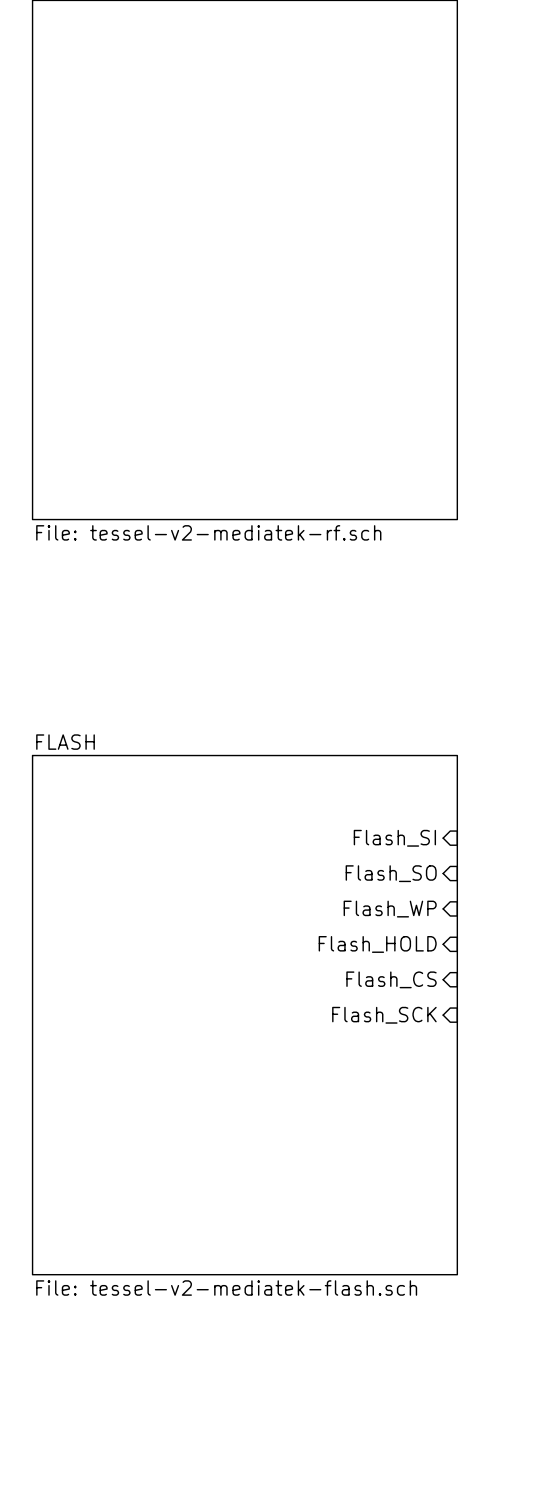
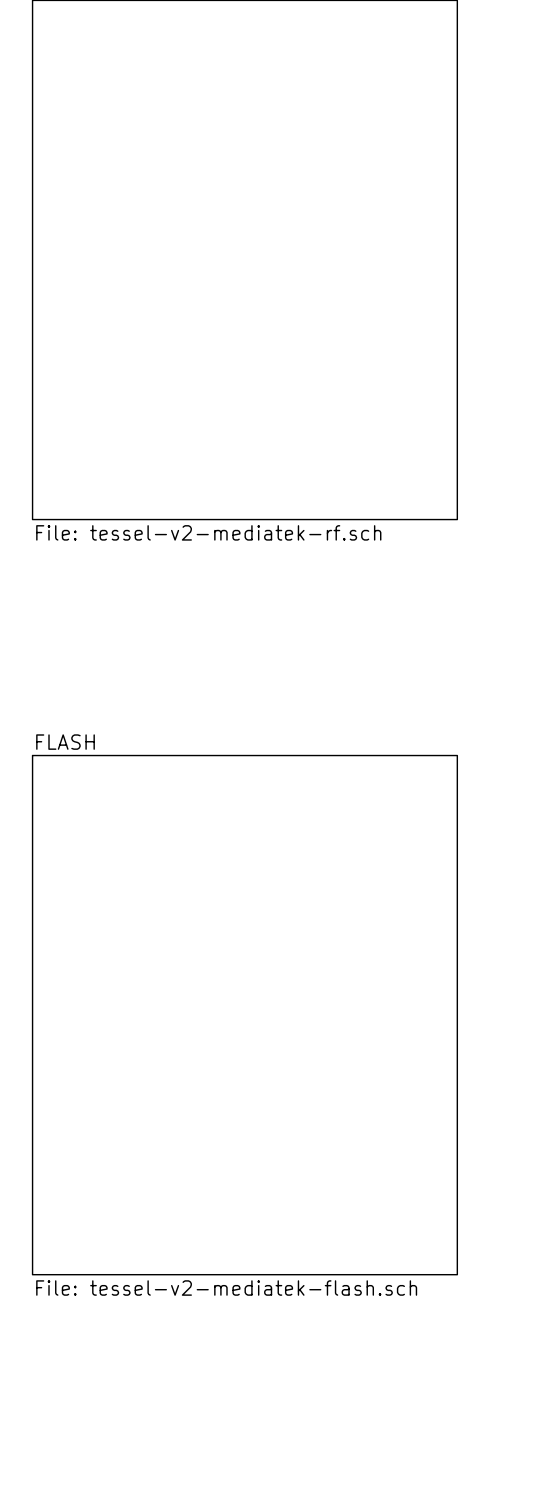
sheet pin: Flash_SI (394, 838) -> none
sheet pin: Flash_SO (391, 873) -> none
sheet pin: Flash_WP (390, 909) -> none
sheet pin: Flash_HOLD (377, 944) -> none
sheet pin: Flash_CS (391, 979) -> none
sheet pin: Flash_SCK (384, 1015) -> none

